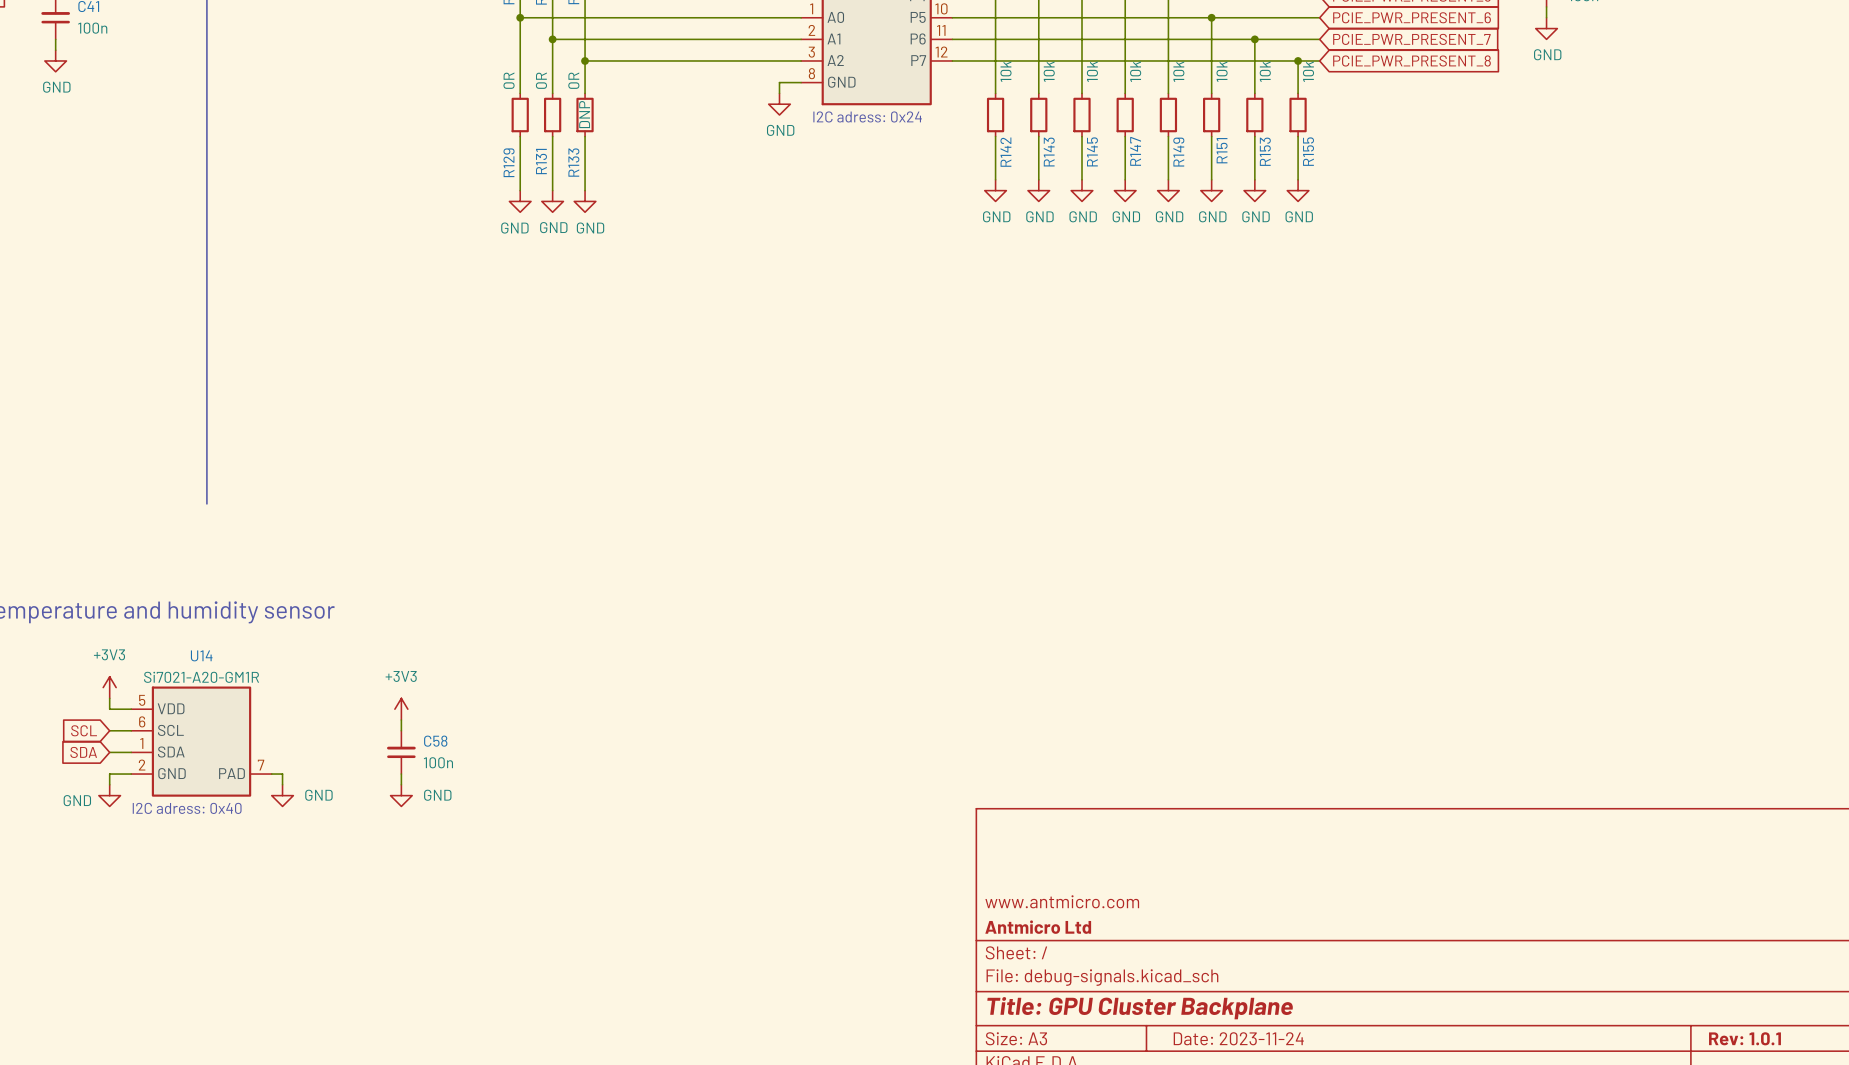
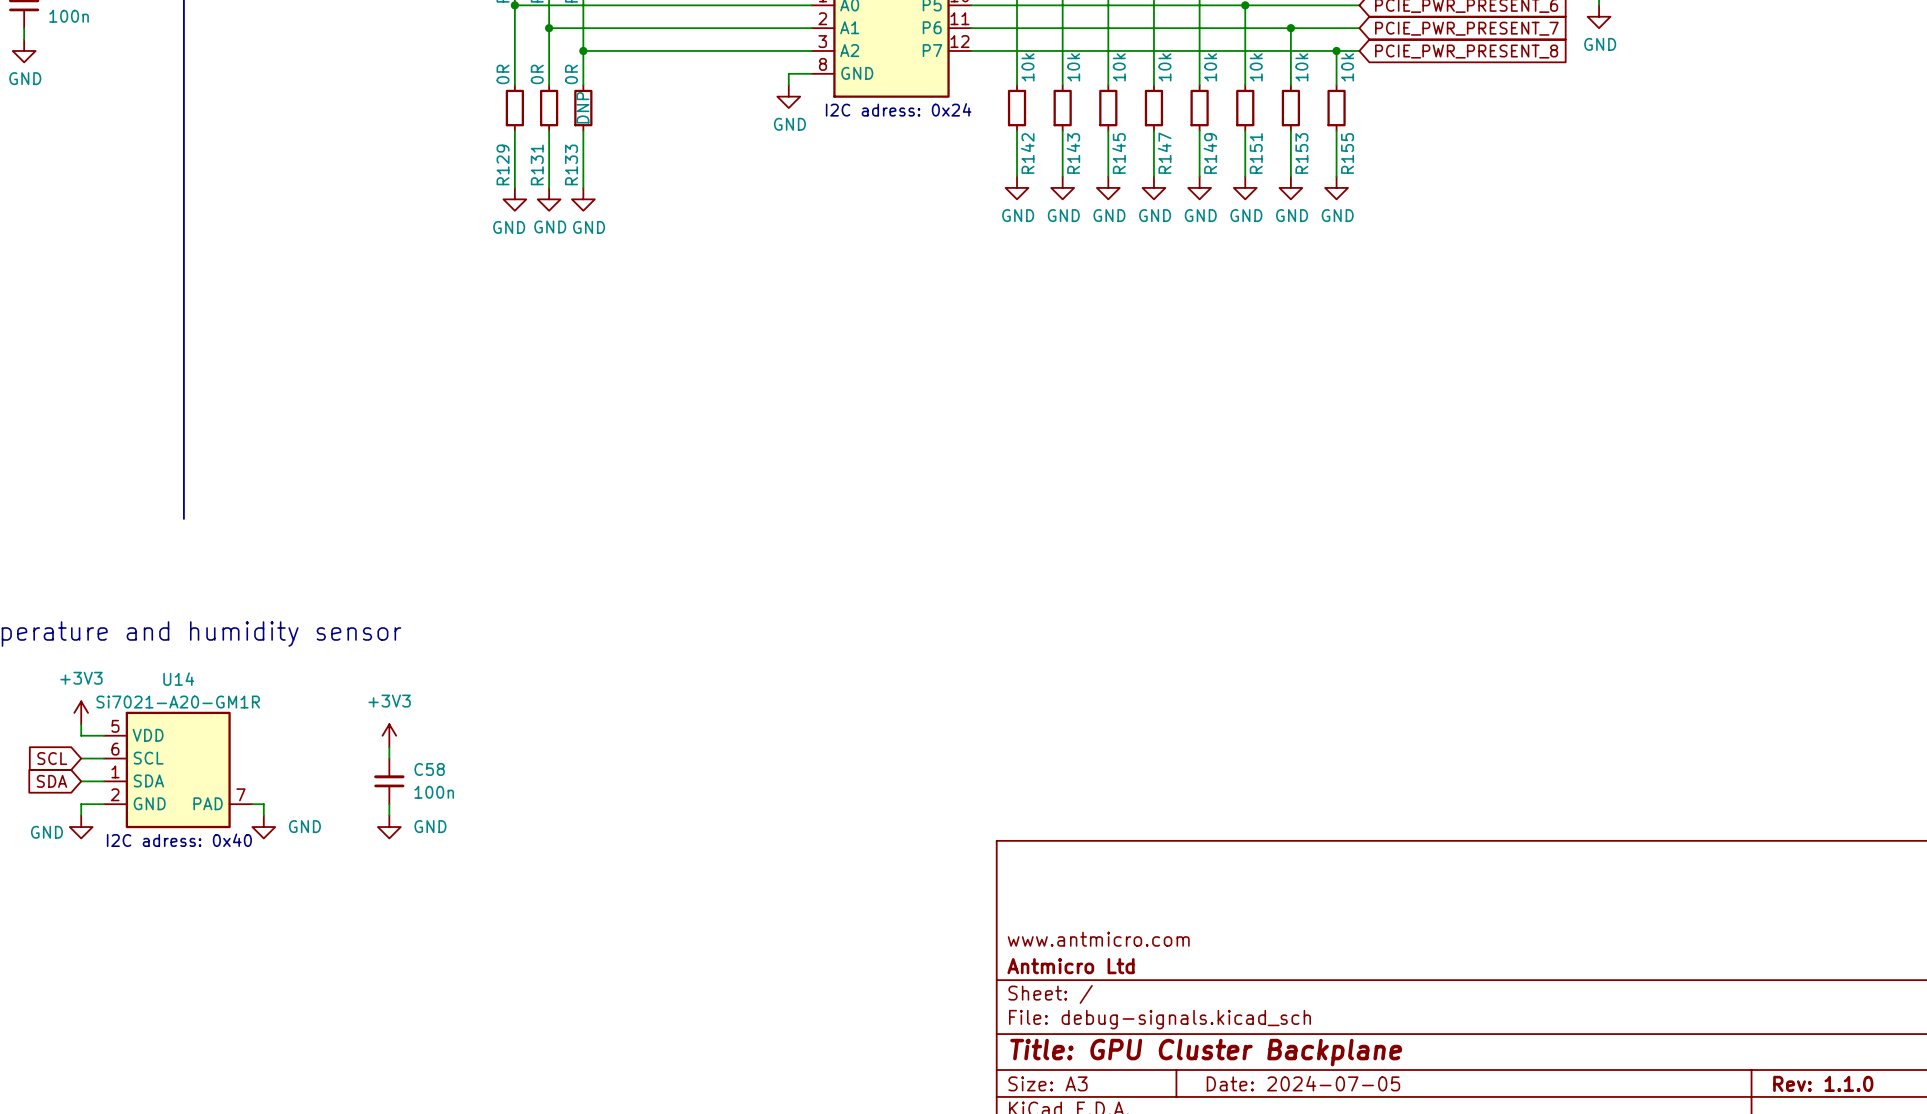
title block: Date: 2023-11-24 (1238, 1038) -> Date: 2024-07-05 (1303, 1083)
title block: Rev: 1.0.1 (1744, 1038) -> Rev: 1.1.0 (1823, 1083)

